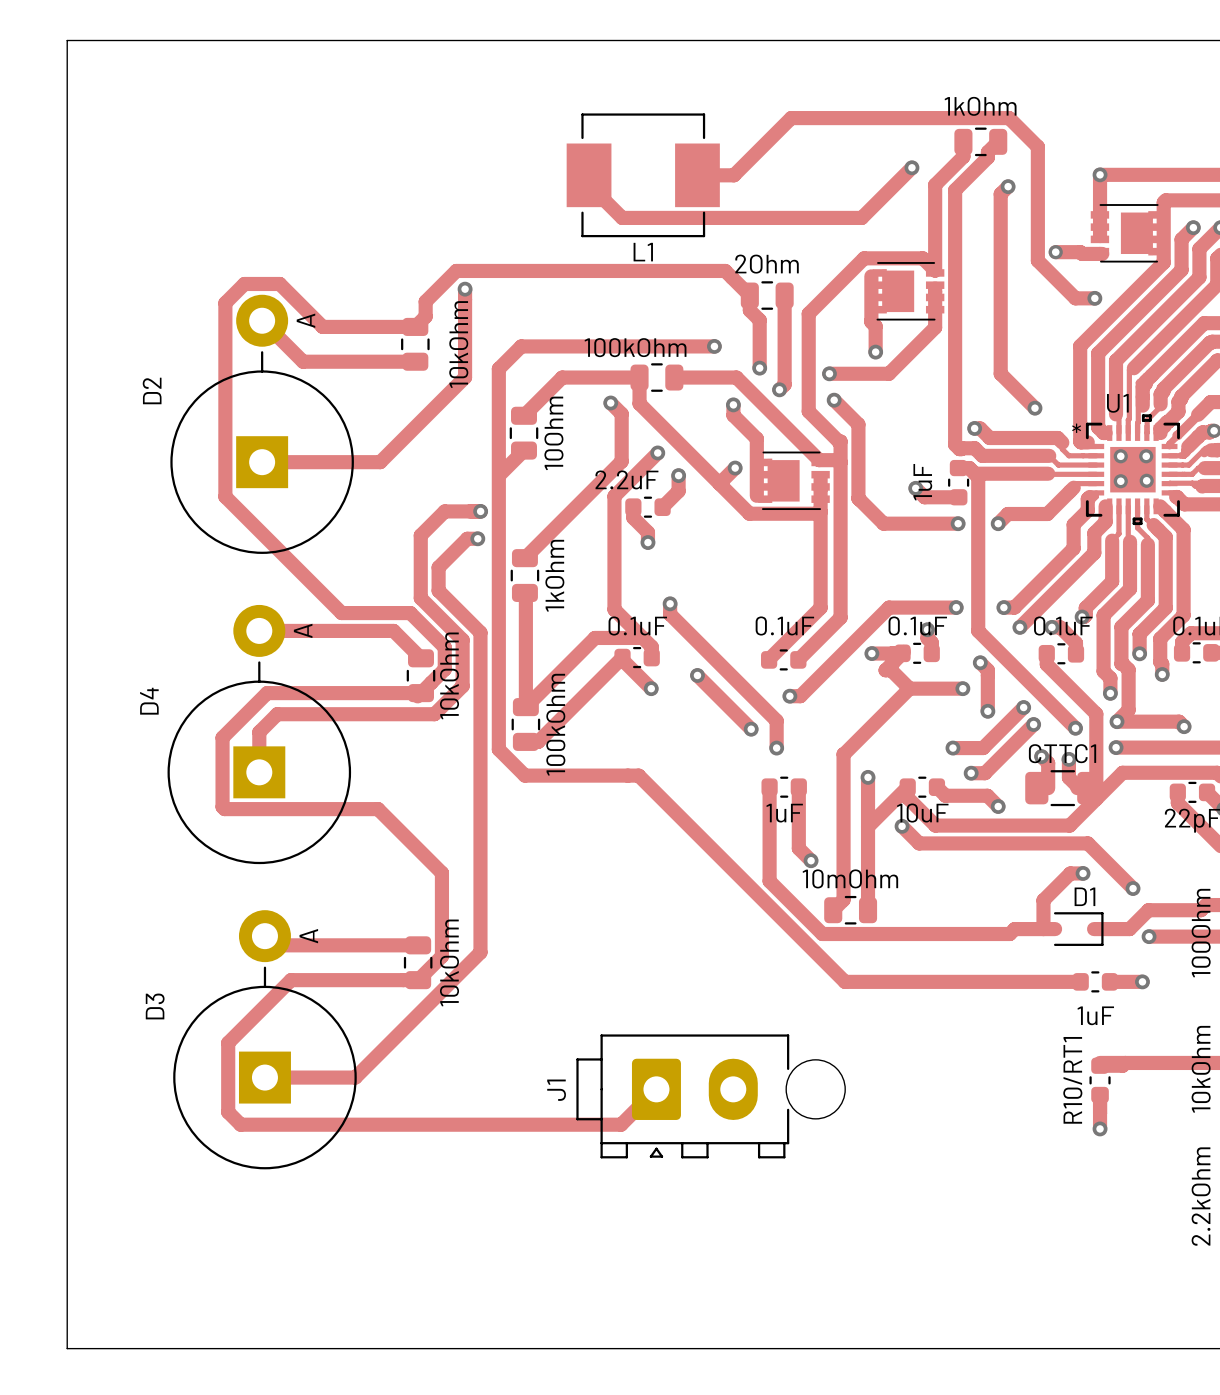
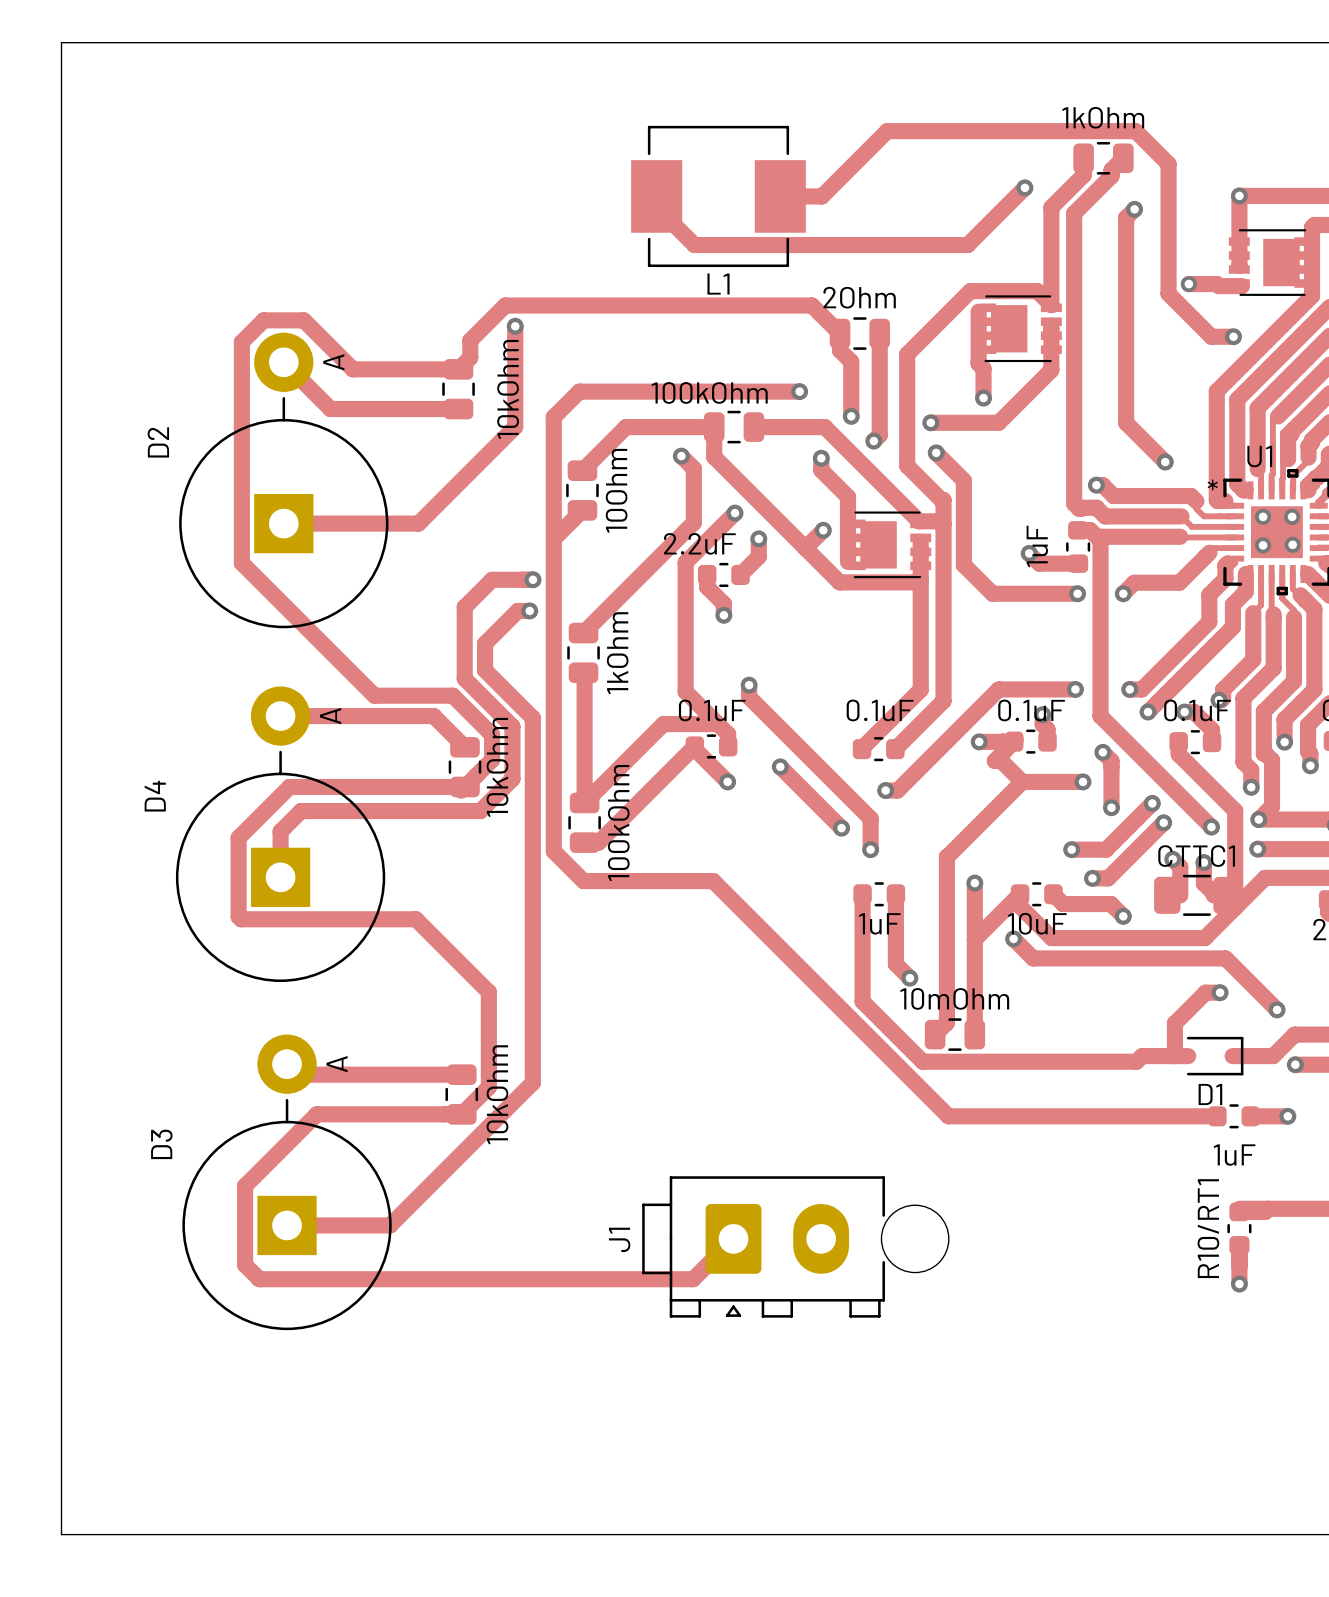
D1 name position: D1 (1084, 896) -> D1 (1210, 1094)

